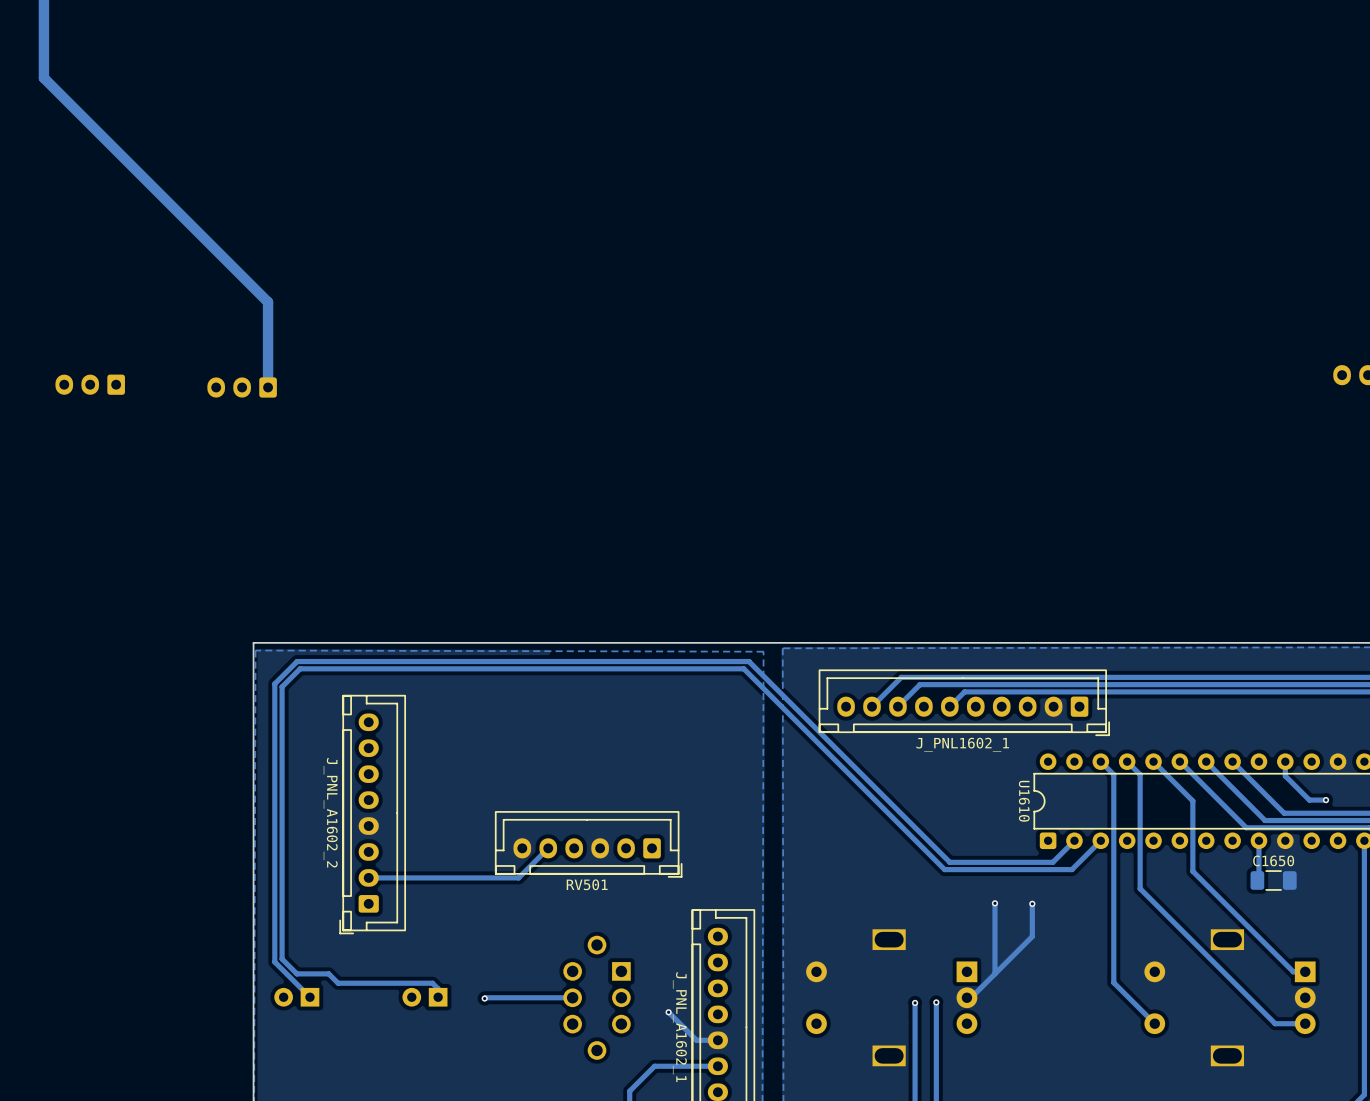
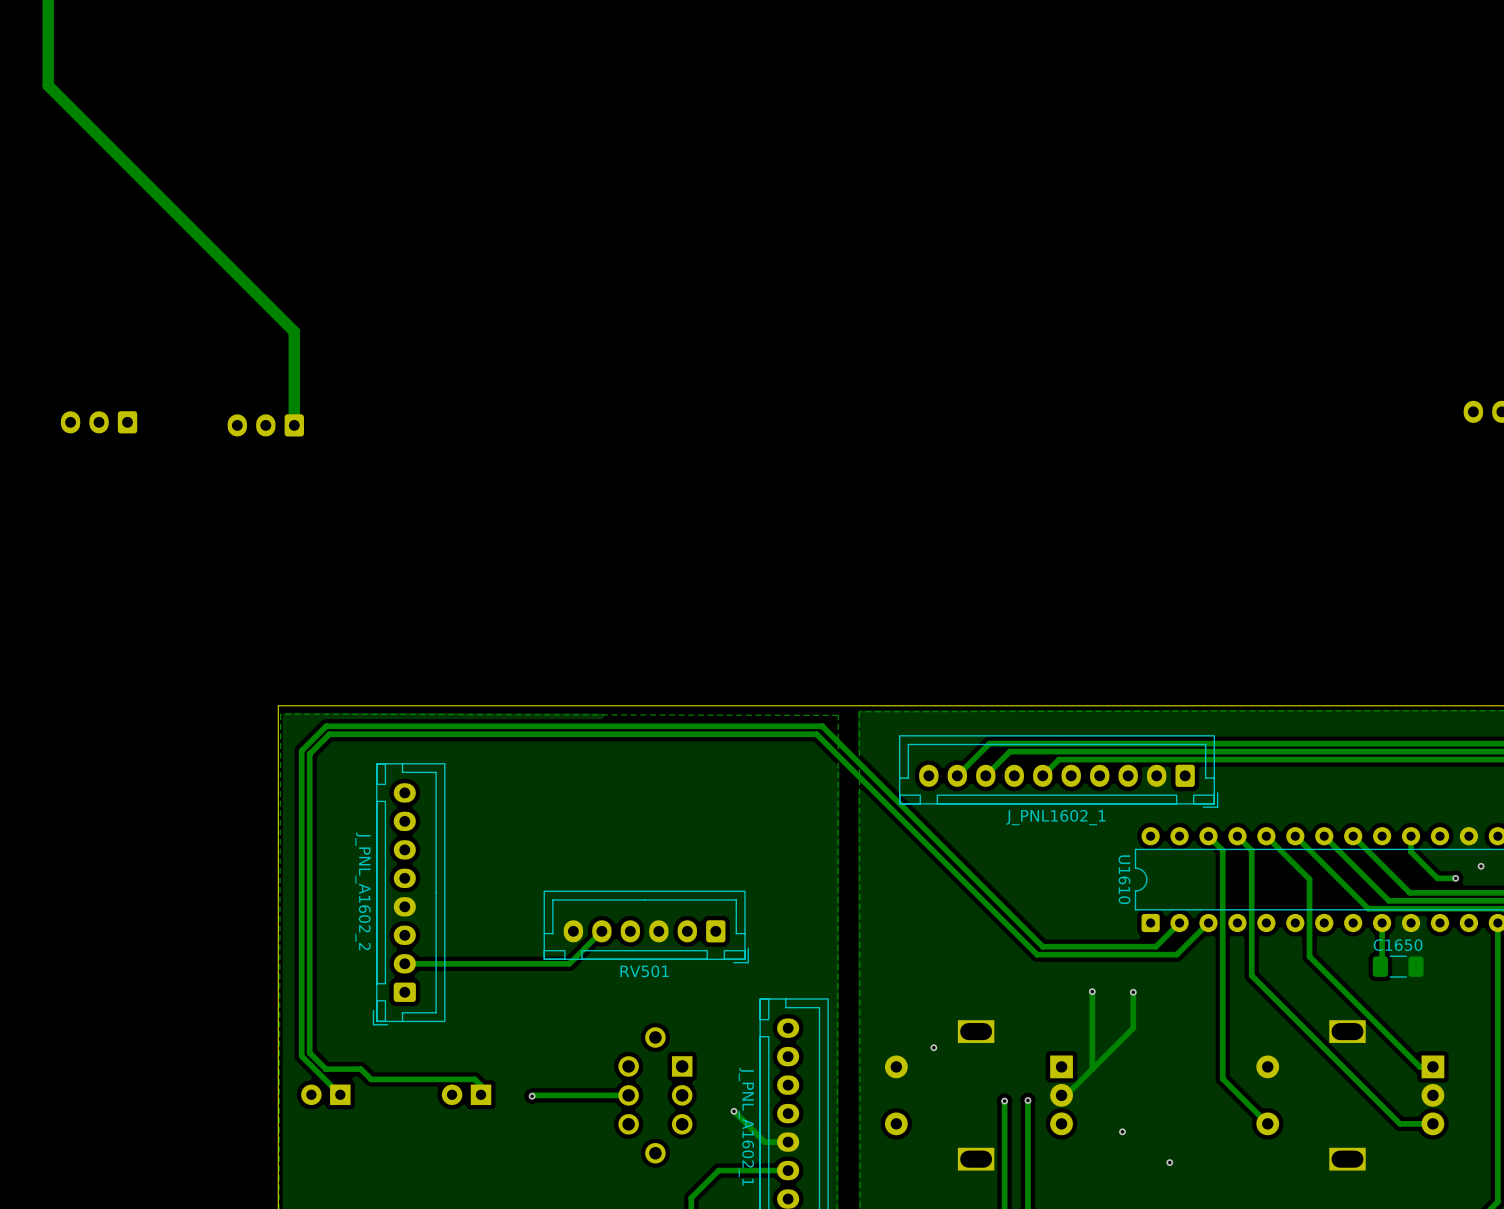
via: none -> (1481, 866)
via: none -> (933, 1047)
via: none -> (1122, 1131)
via: none -> (1169, 1162)

